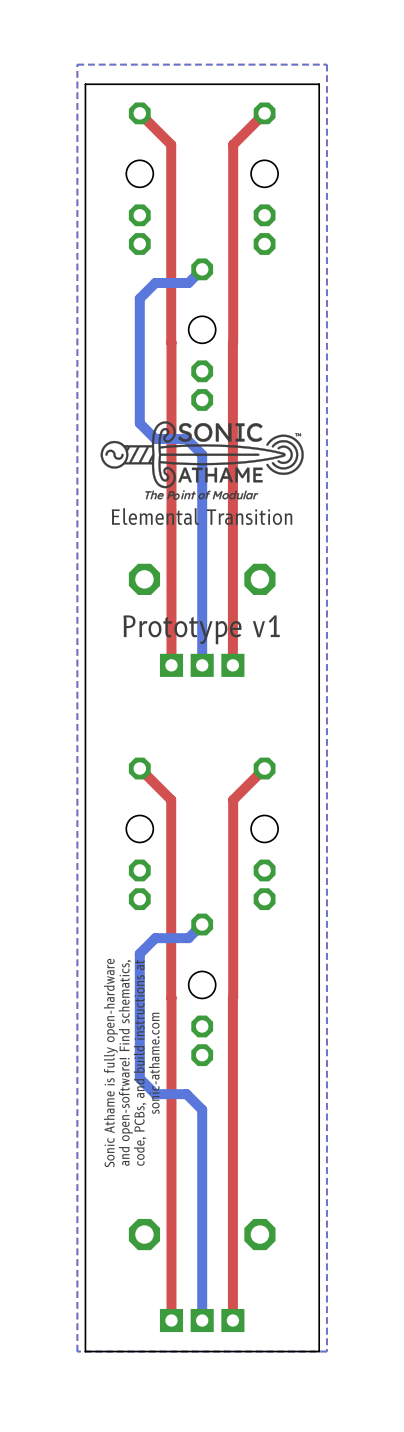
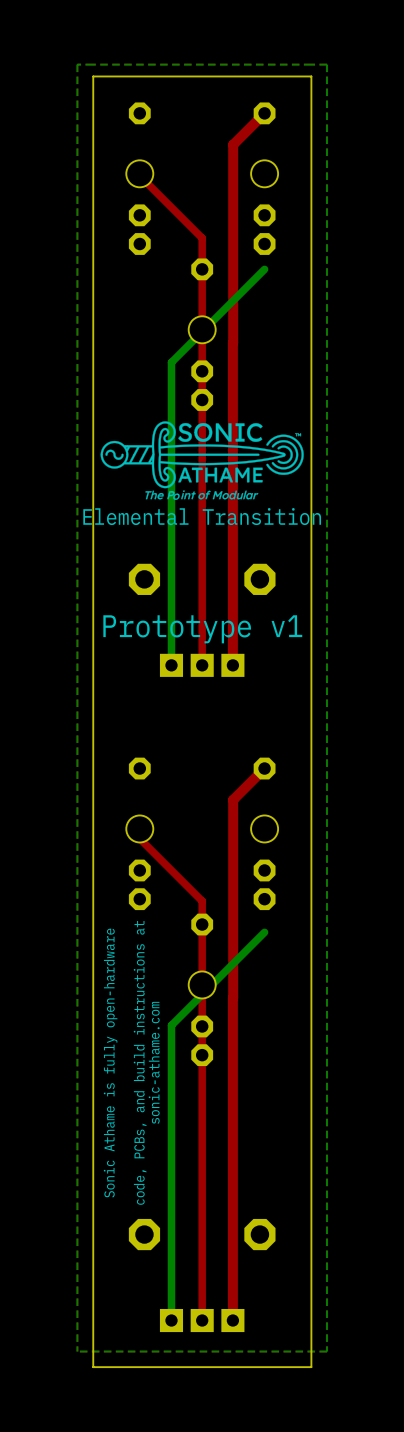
board edge: (319, 84) (85, 84) (85, 1351) (319, 1351) (319, 84) -> (311, 76) (311, 1367) (93, 1367) (93, 76) (311, 76)
top track: (139, 113) (171, 144) (171, 665) -> none
top track: none -> (139, 175) (202, 238) (202, 665)
bottom track: (202, 269) (188, 283) (155, 283) (139, 298) (139, 423) (155, 438) (186, 438) (202, 454) (202, 665) -> none
bottom track: none -> (264, 269) (171, 362) (171, 665)
top track: (139, 768) (171, 799) (171, 1320) -> none
top track: none -> (139, 838) (202, 901) (202, 1328)
bottom track: (202, 924) (188, 938) (155, 938) (139, 953) (139, 1078) (155, 1094) (186, 1094) (202, 1109) (202, 1320) -> none
bottom track: none -> (264, 932) (171, 1025) (171, 1328)
text: and open-software! Find schematics, (125, 1063) -> none

